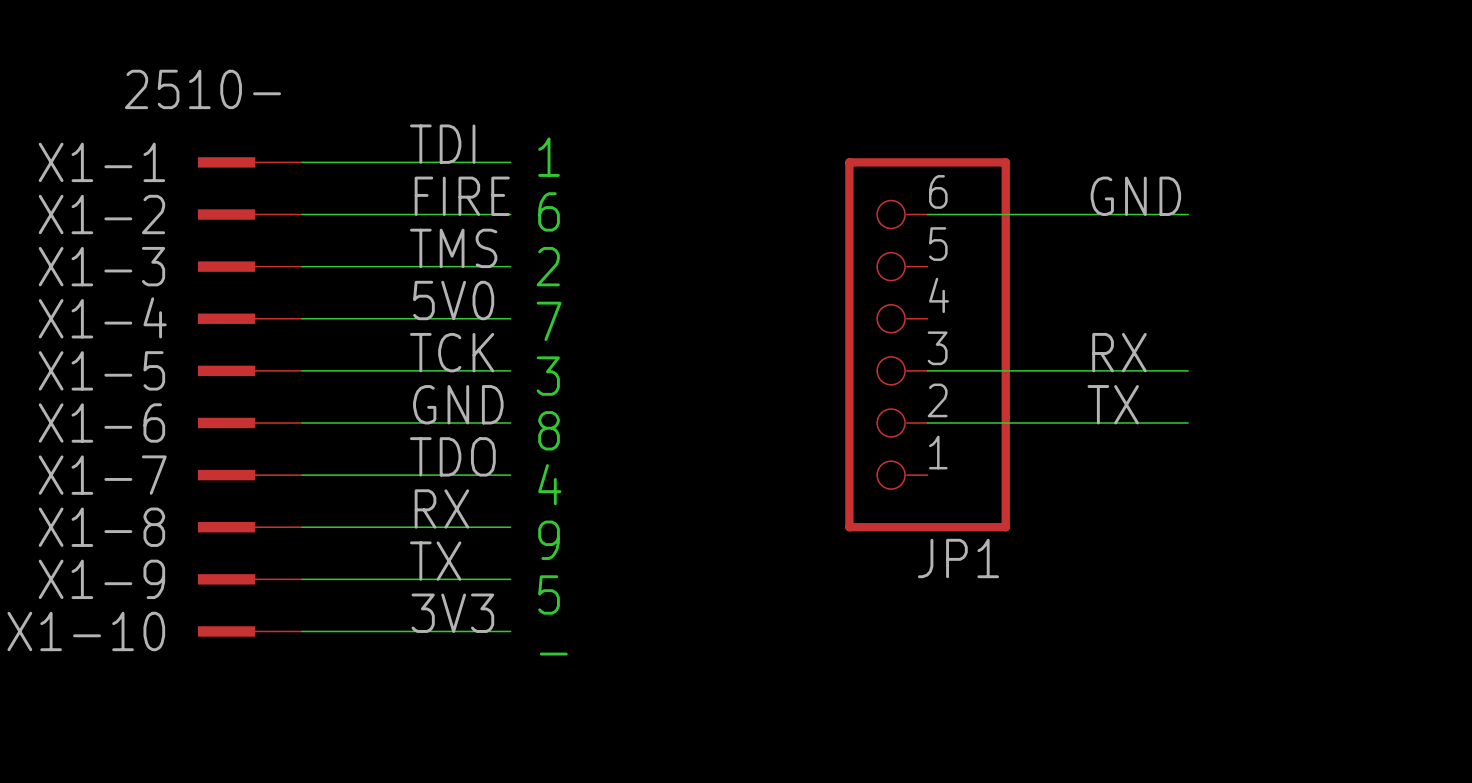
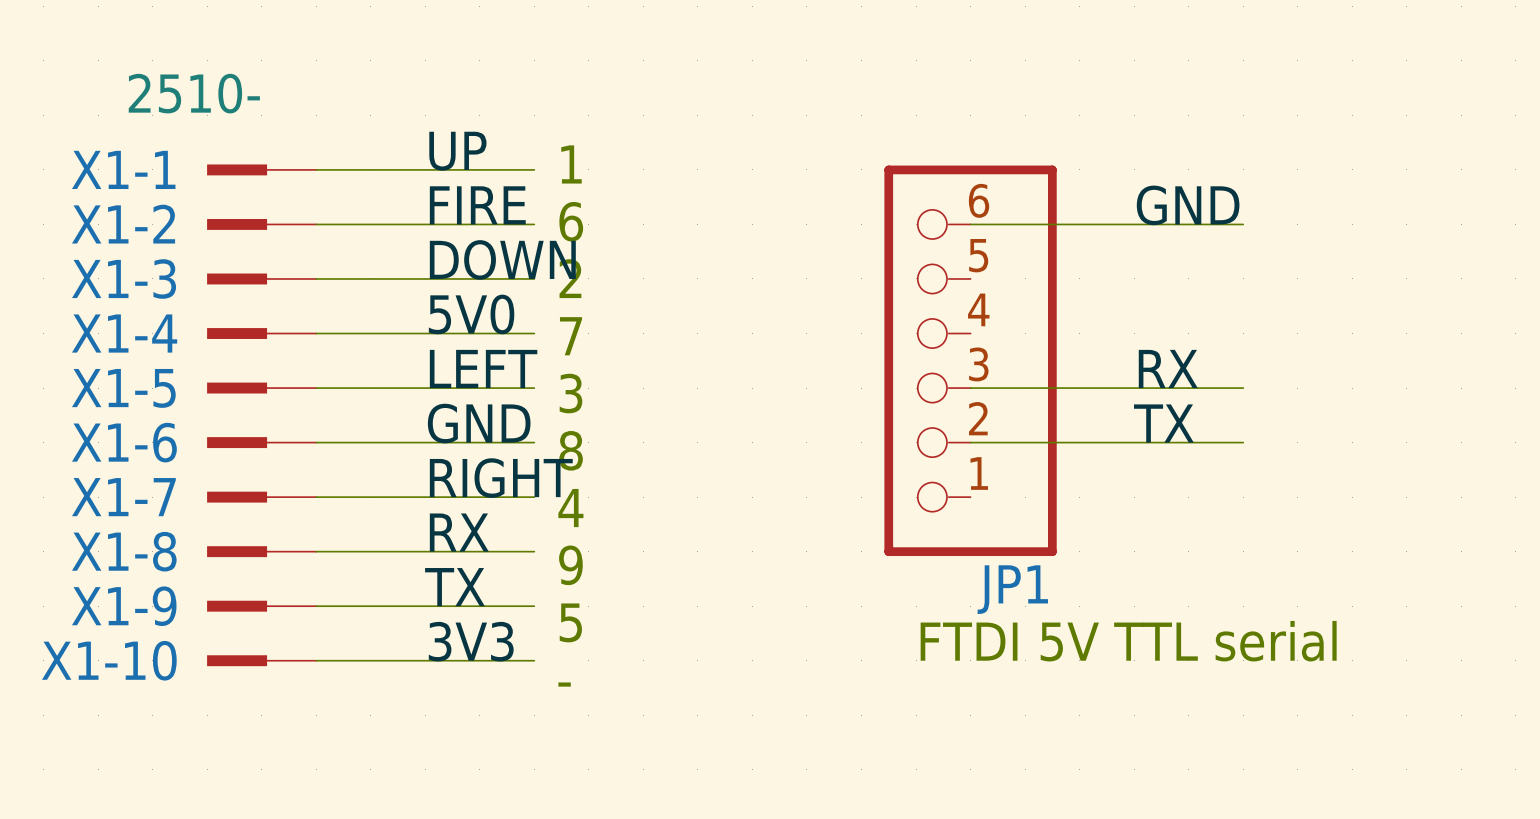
label: TDI (442, 144) -> UP (457, 151)
label: TMS (453, 248) -> DOWN (502, 259)
label: TCK (452, 352) -> LEFT (483, 368)
label: TDO (452, 456) -> RIGHT (501, 478)
text: none -> FTDI 5V TTL serial (1128, 641)

